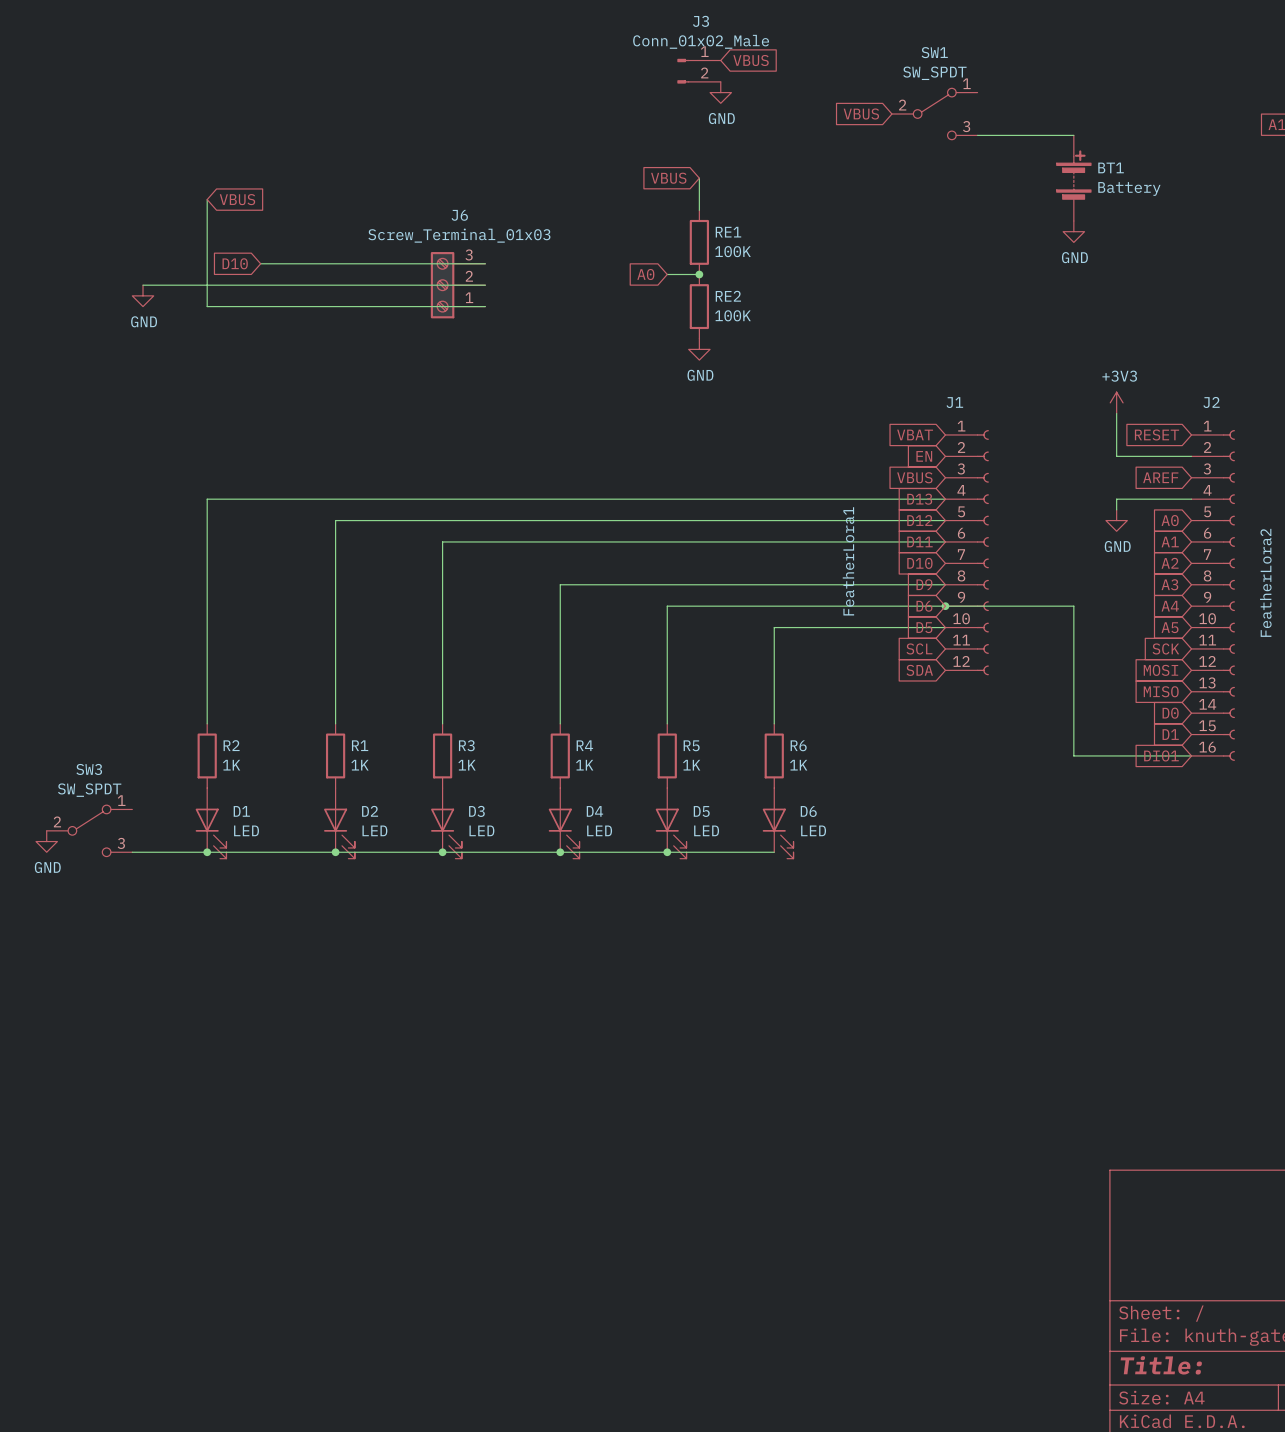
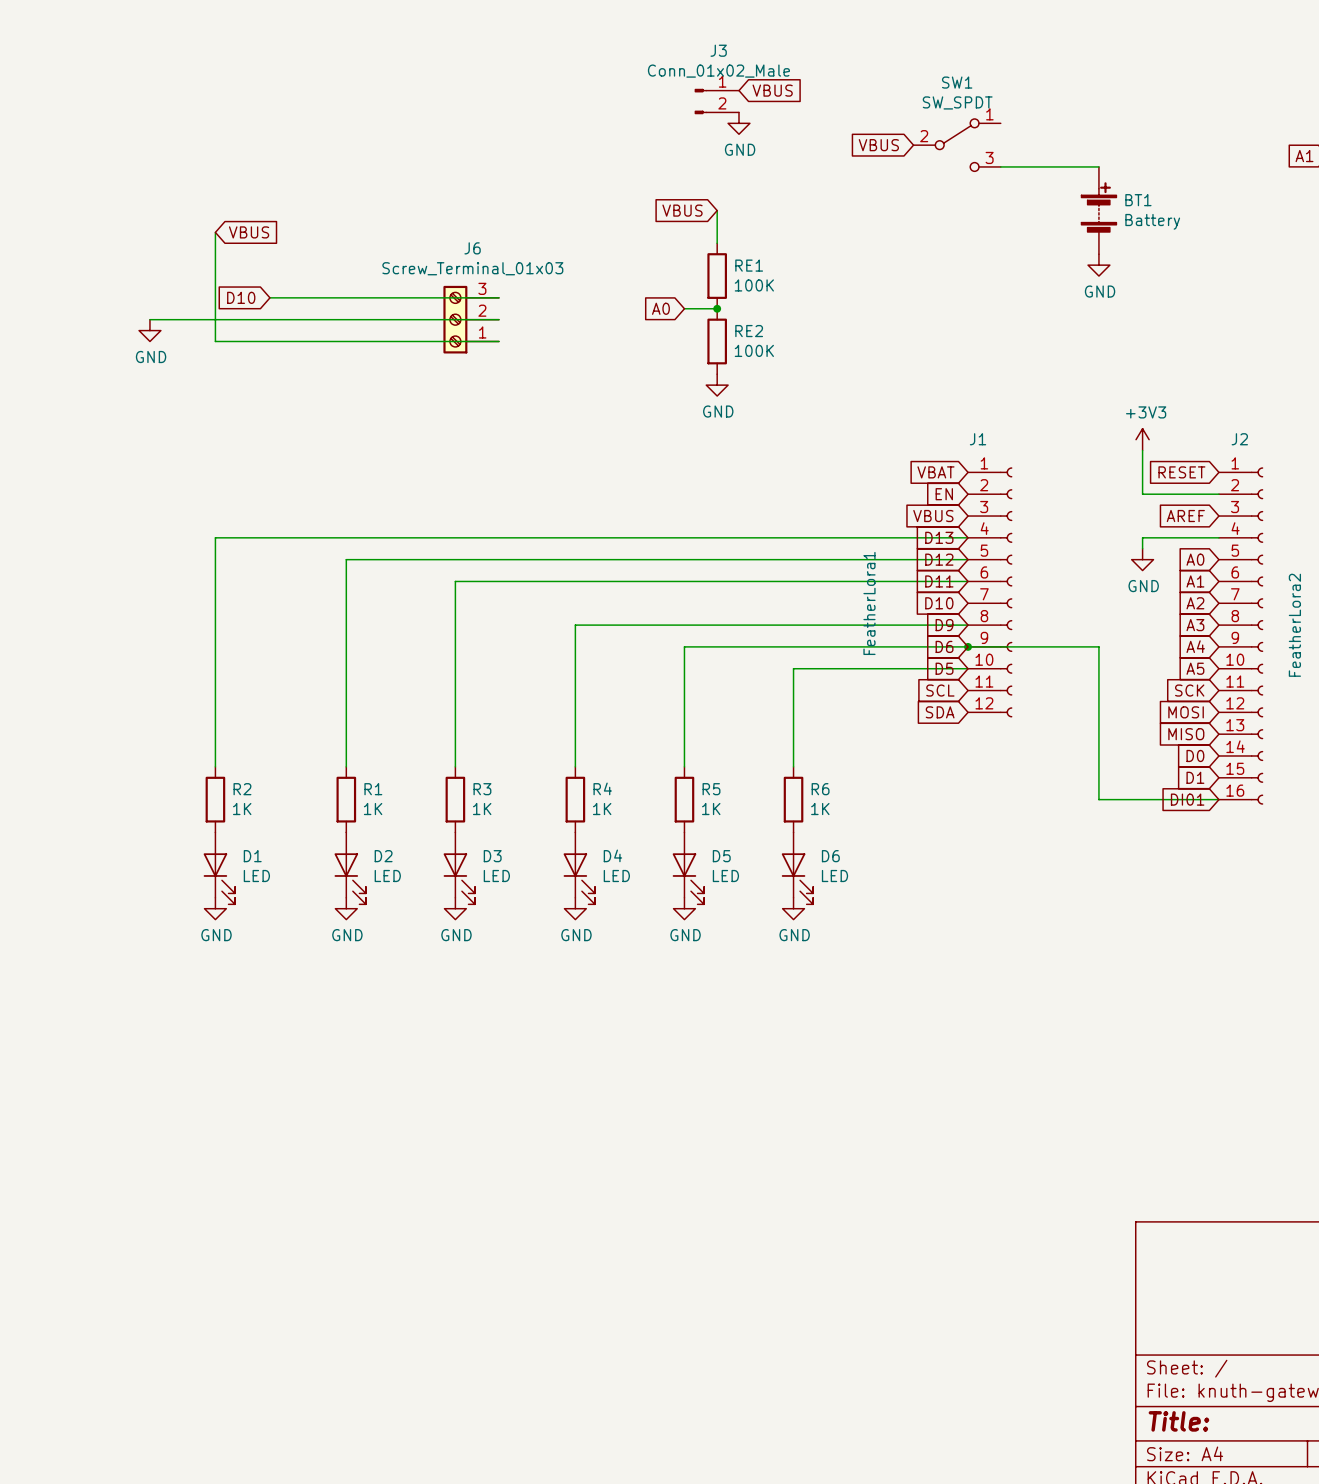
SW3: SW_SPDT (89, 830) -> none
power symbol: GND (46, 841) -> none
wire: (132, 852) (774, 852) -> none
junction: (207, 852) -> none
junction: (335, 852) -> none
junction: (442, 852) -> none
junction: (560, 852) -> none
junction: (667, 852) -> none
power symbol: none -> GND (215, 908)
power symbol: none -> GND (346, 908)
power symbol: none -> GND (455, 908)
power symbol: none -> GND (575, 908)
power symbol: none -> GND (684, 908)
power symbol: none -> GND (793, 908)

